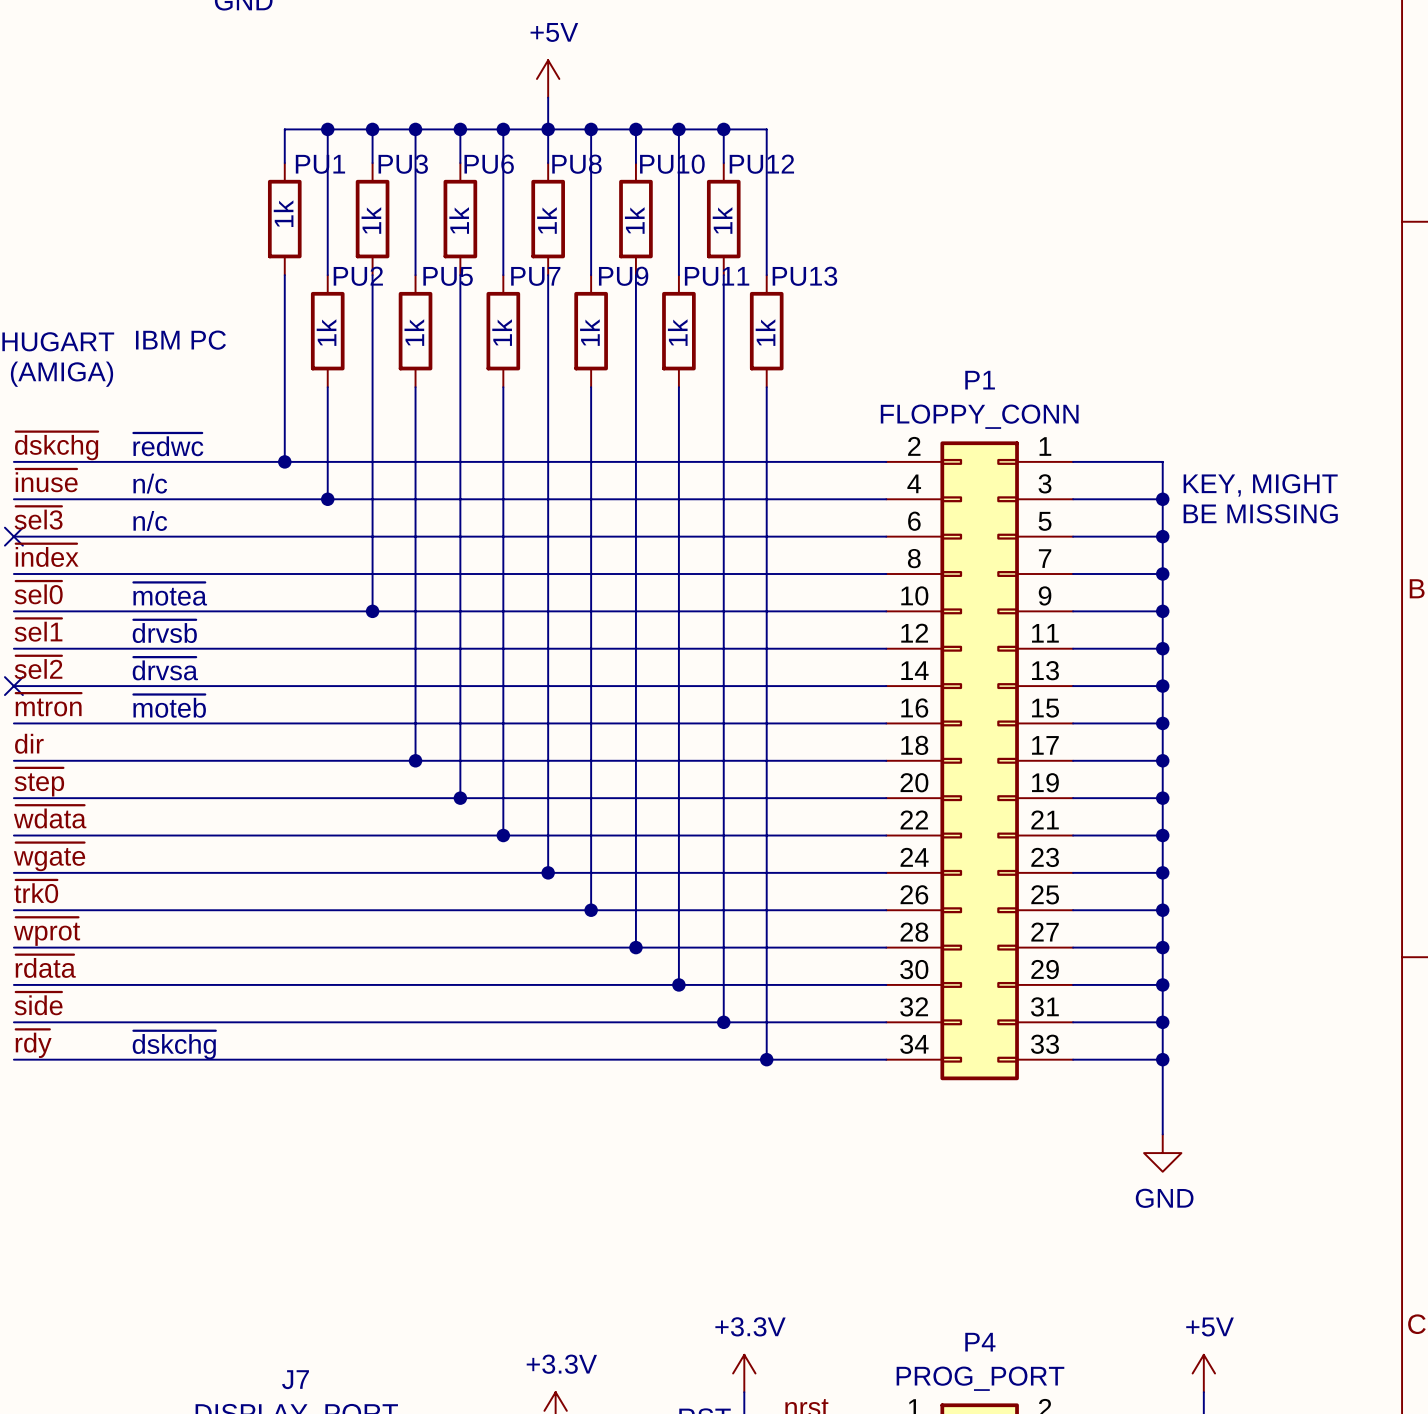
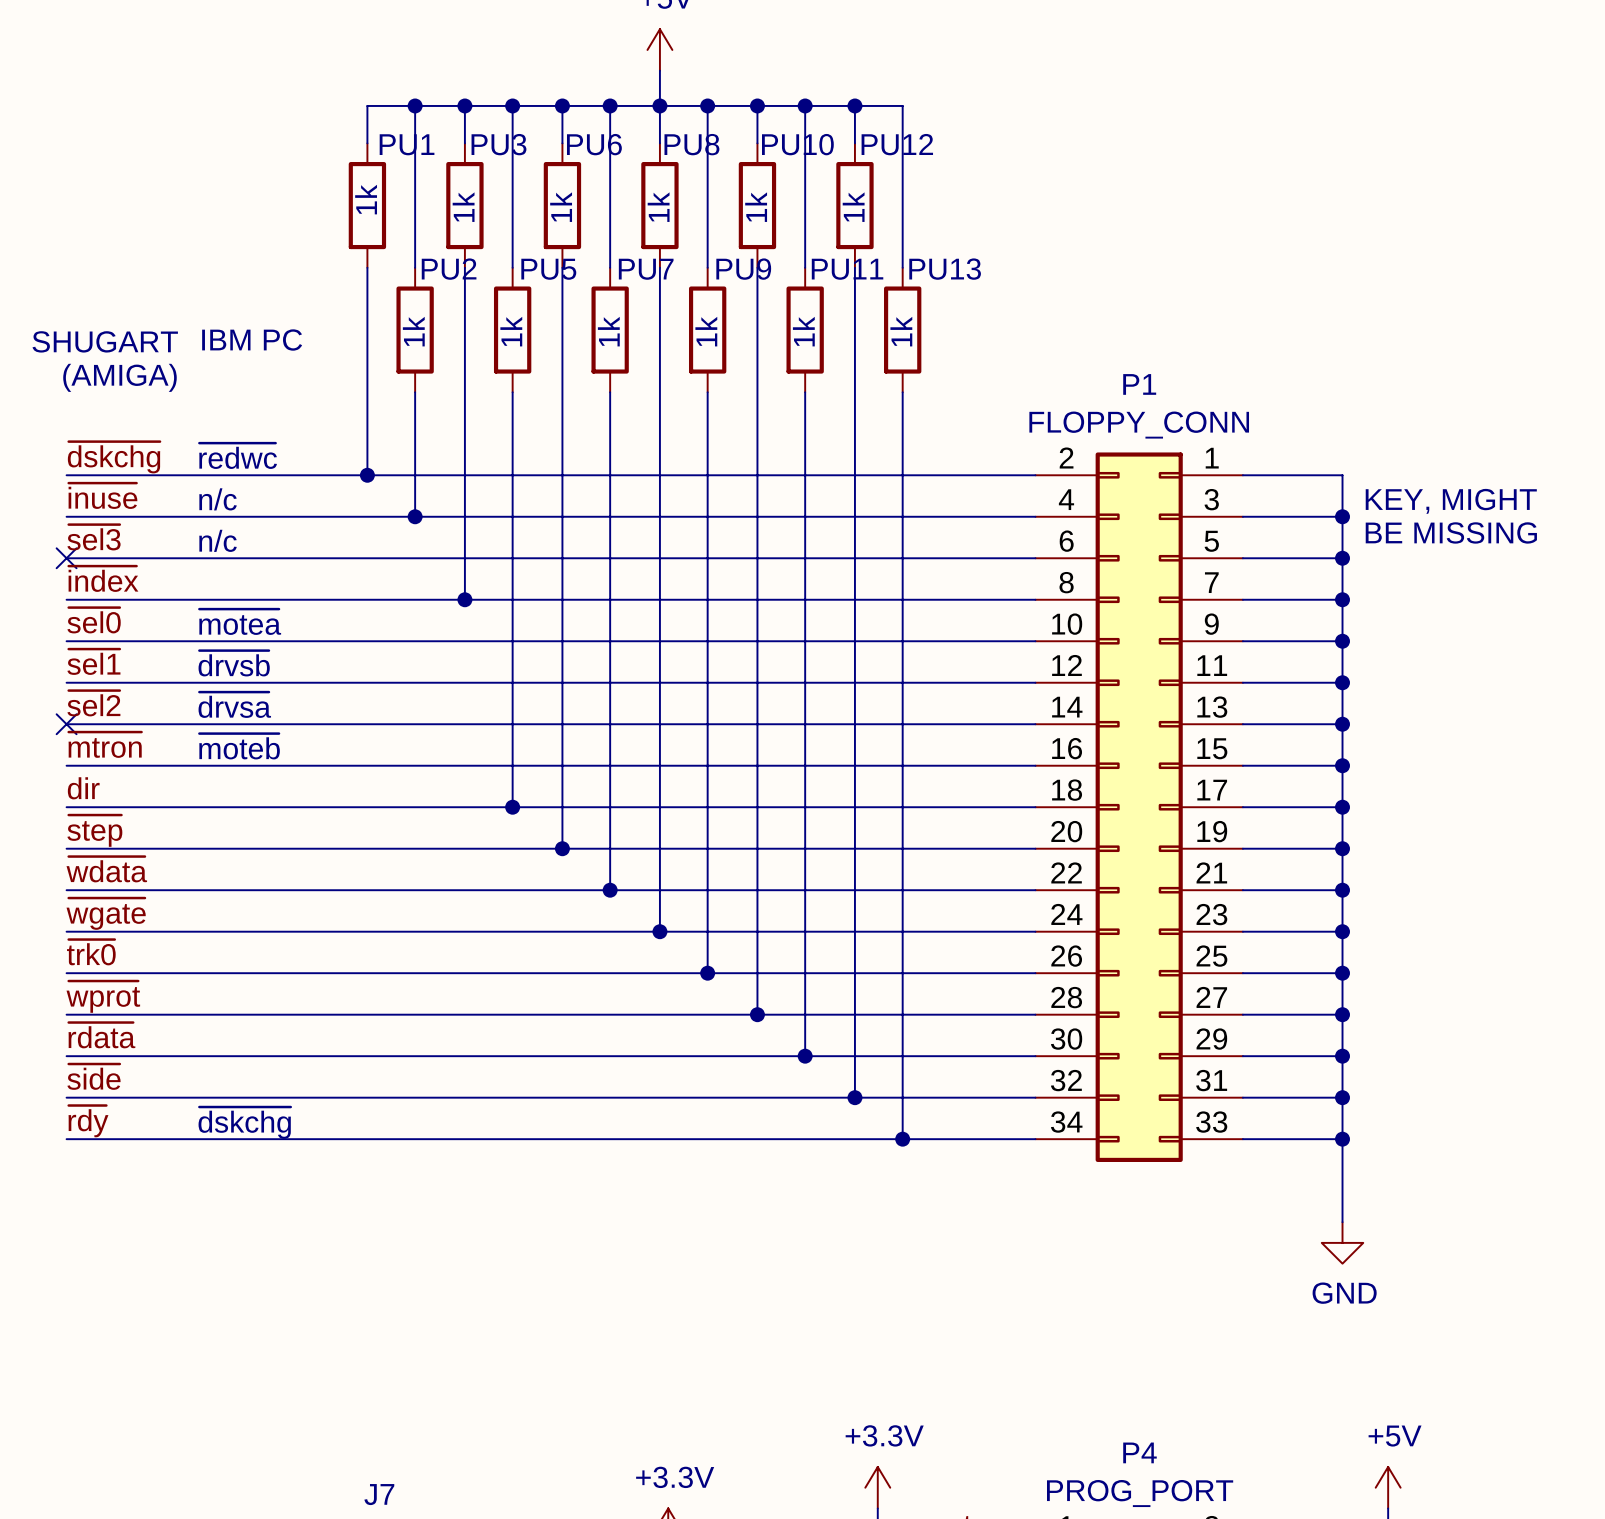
wire: (372, 574) (372, 611) -> none
junction position: (372, 611) -> (464, 599)

